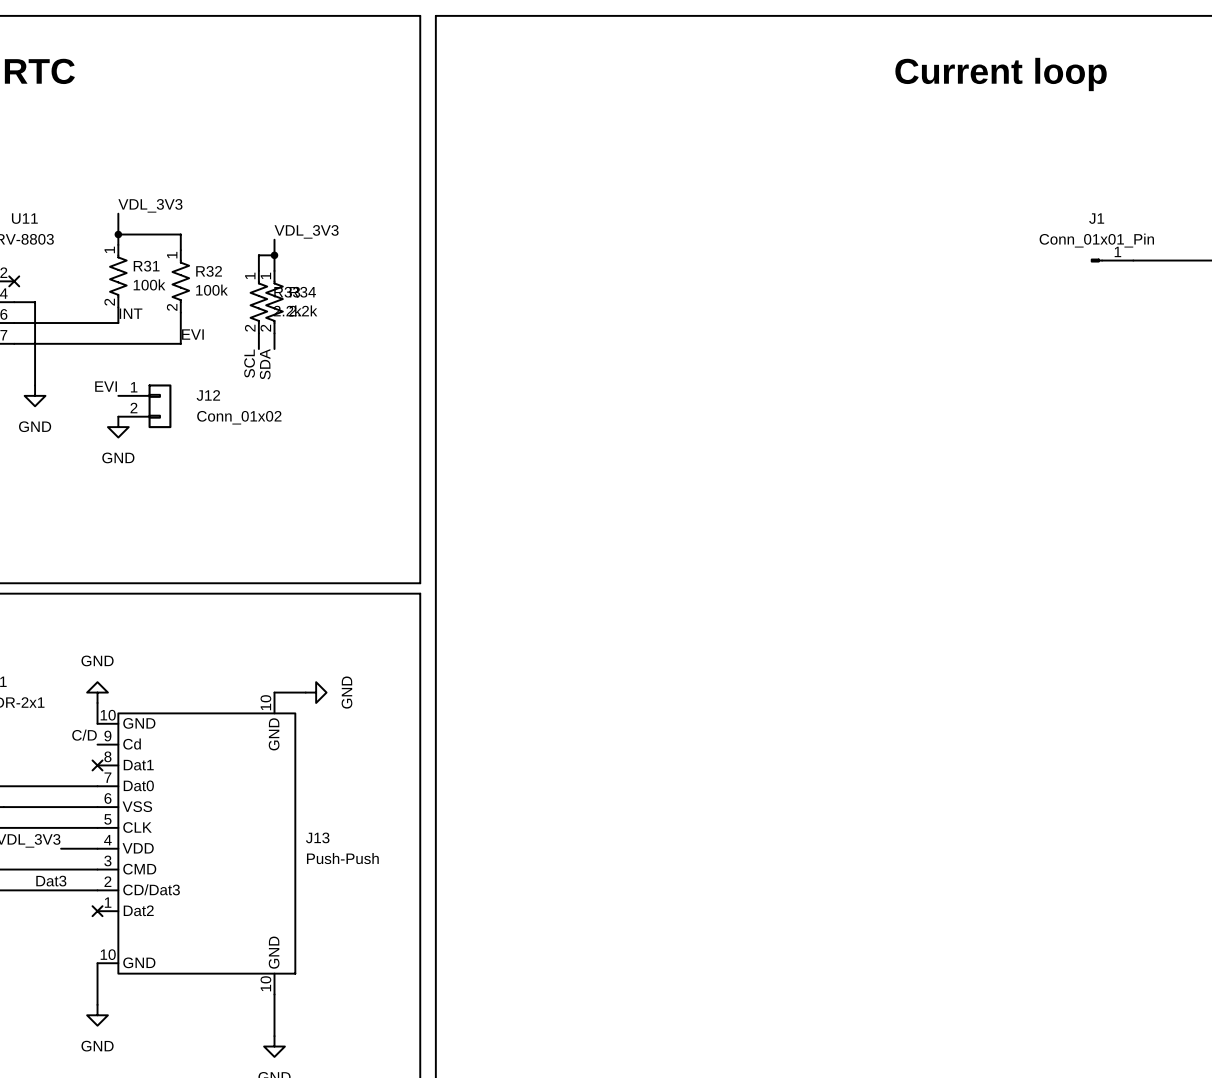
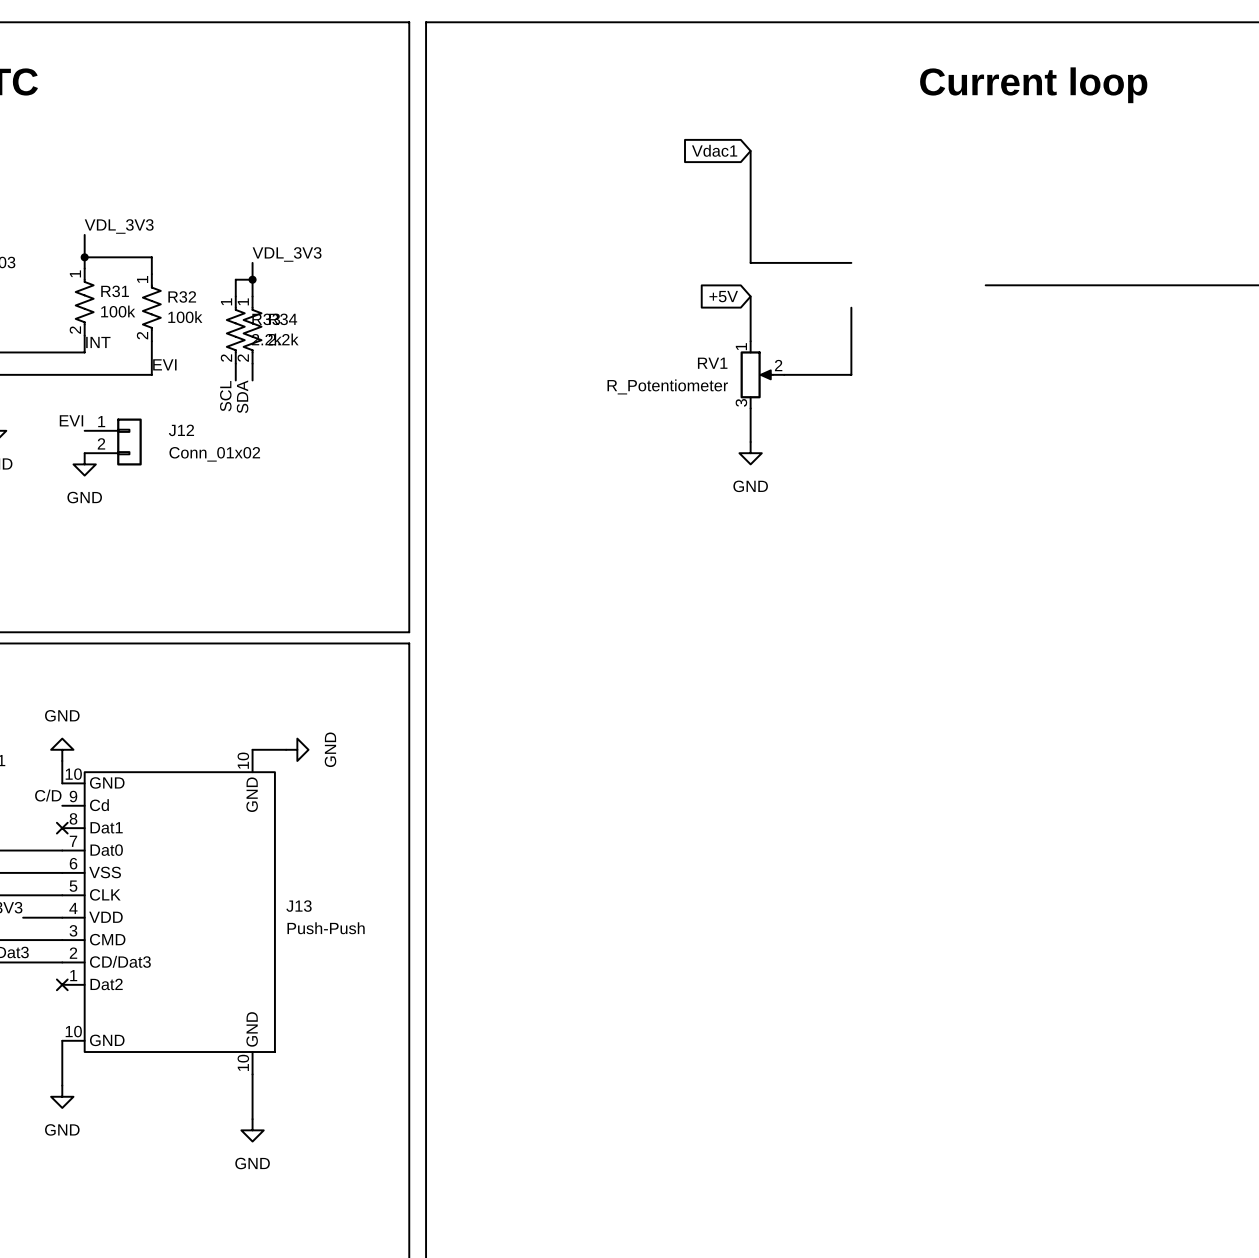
global label: none -> Vdac1 (714, 150)
wire: none -> (750, 150) (750, 262) (851, 262)
wire: none -> (985, 285) (1175, 285)
J1: Conn_01x01_Pin (1112, 260) -> none
wire: none -> (750, 296) (750, 341)
global label: none -> +5V (723, 296)
wire: none -> (851, 307) (851, 374) (784, 374)
RV1: none -> R_Potentiometer (762, 374)
wire: none -> (750, 408) (750, 442)
power symbol: none -> GND (750, 453)

